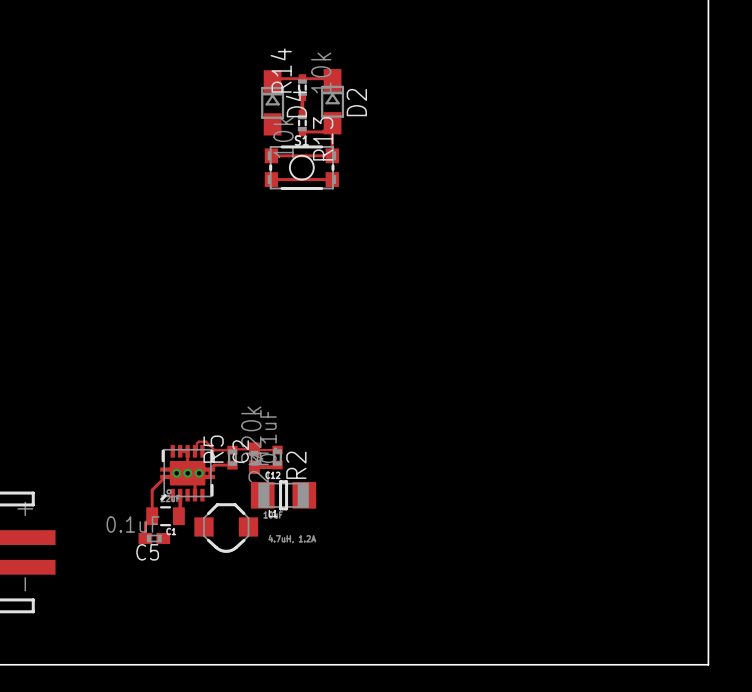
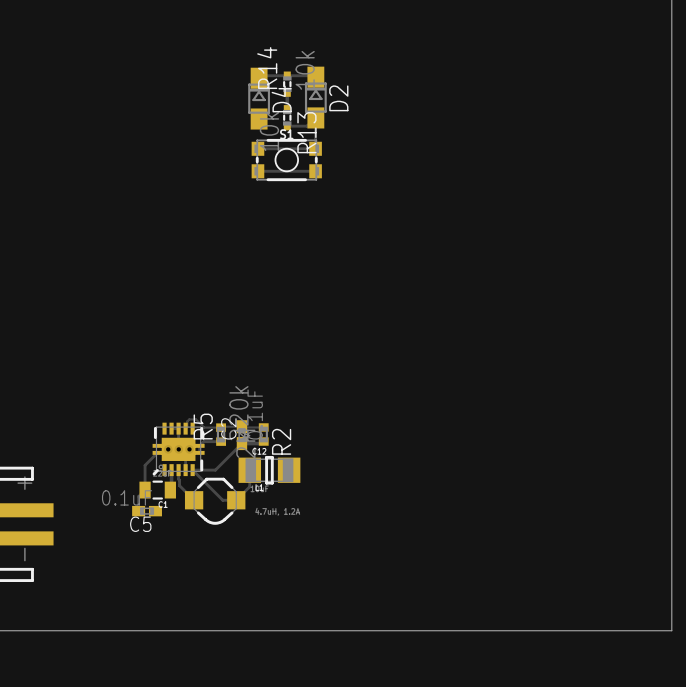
track: none -> (241, 443) (215, 470) (192, 470) (222, 500) (236, 500) (249, 486) (249, 470)
track: none -> (178, 470) (179, 485) (194, 500)

